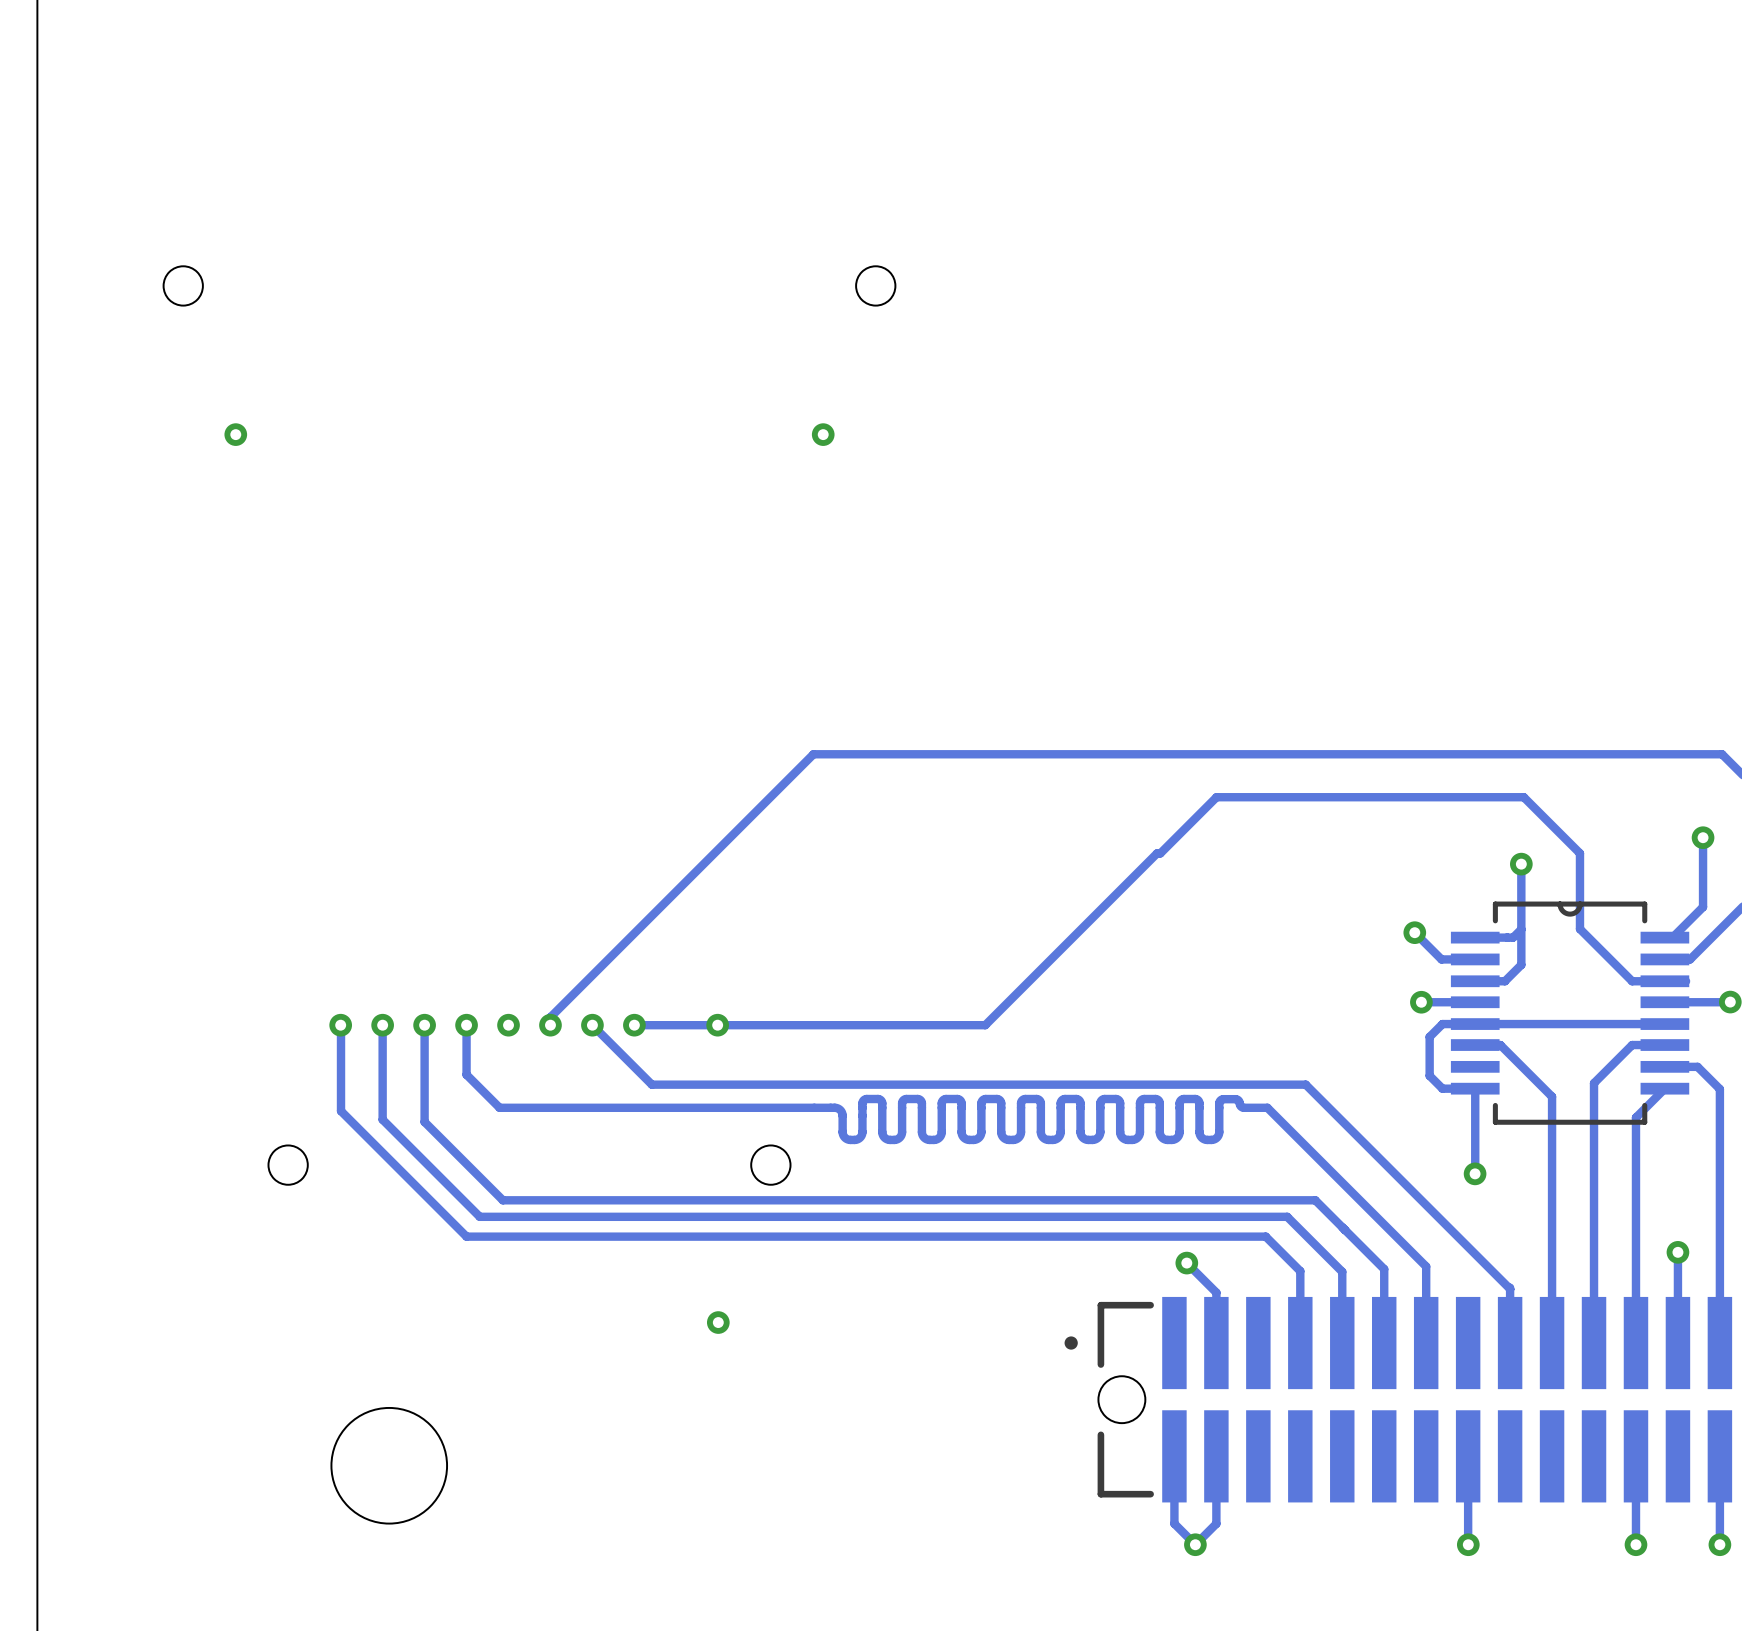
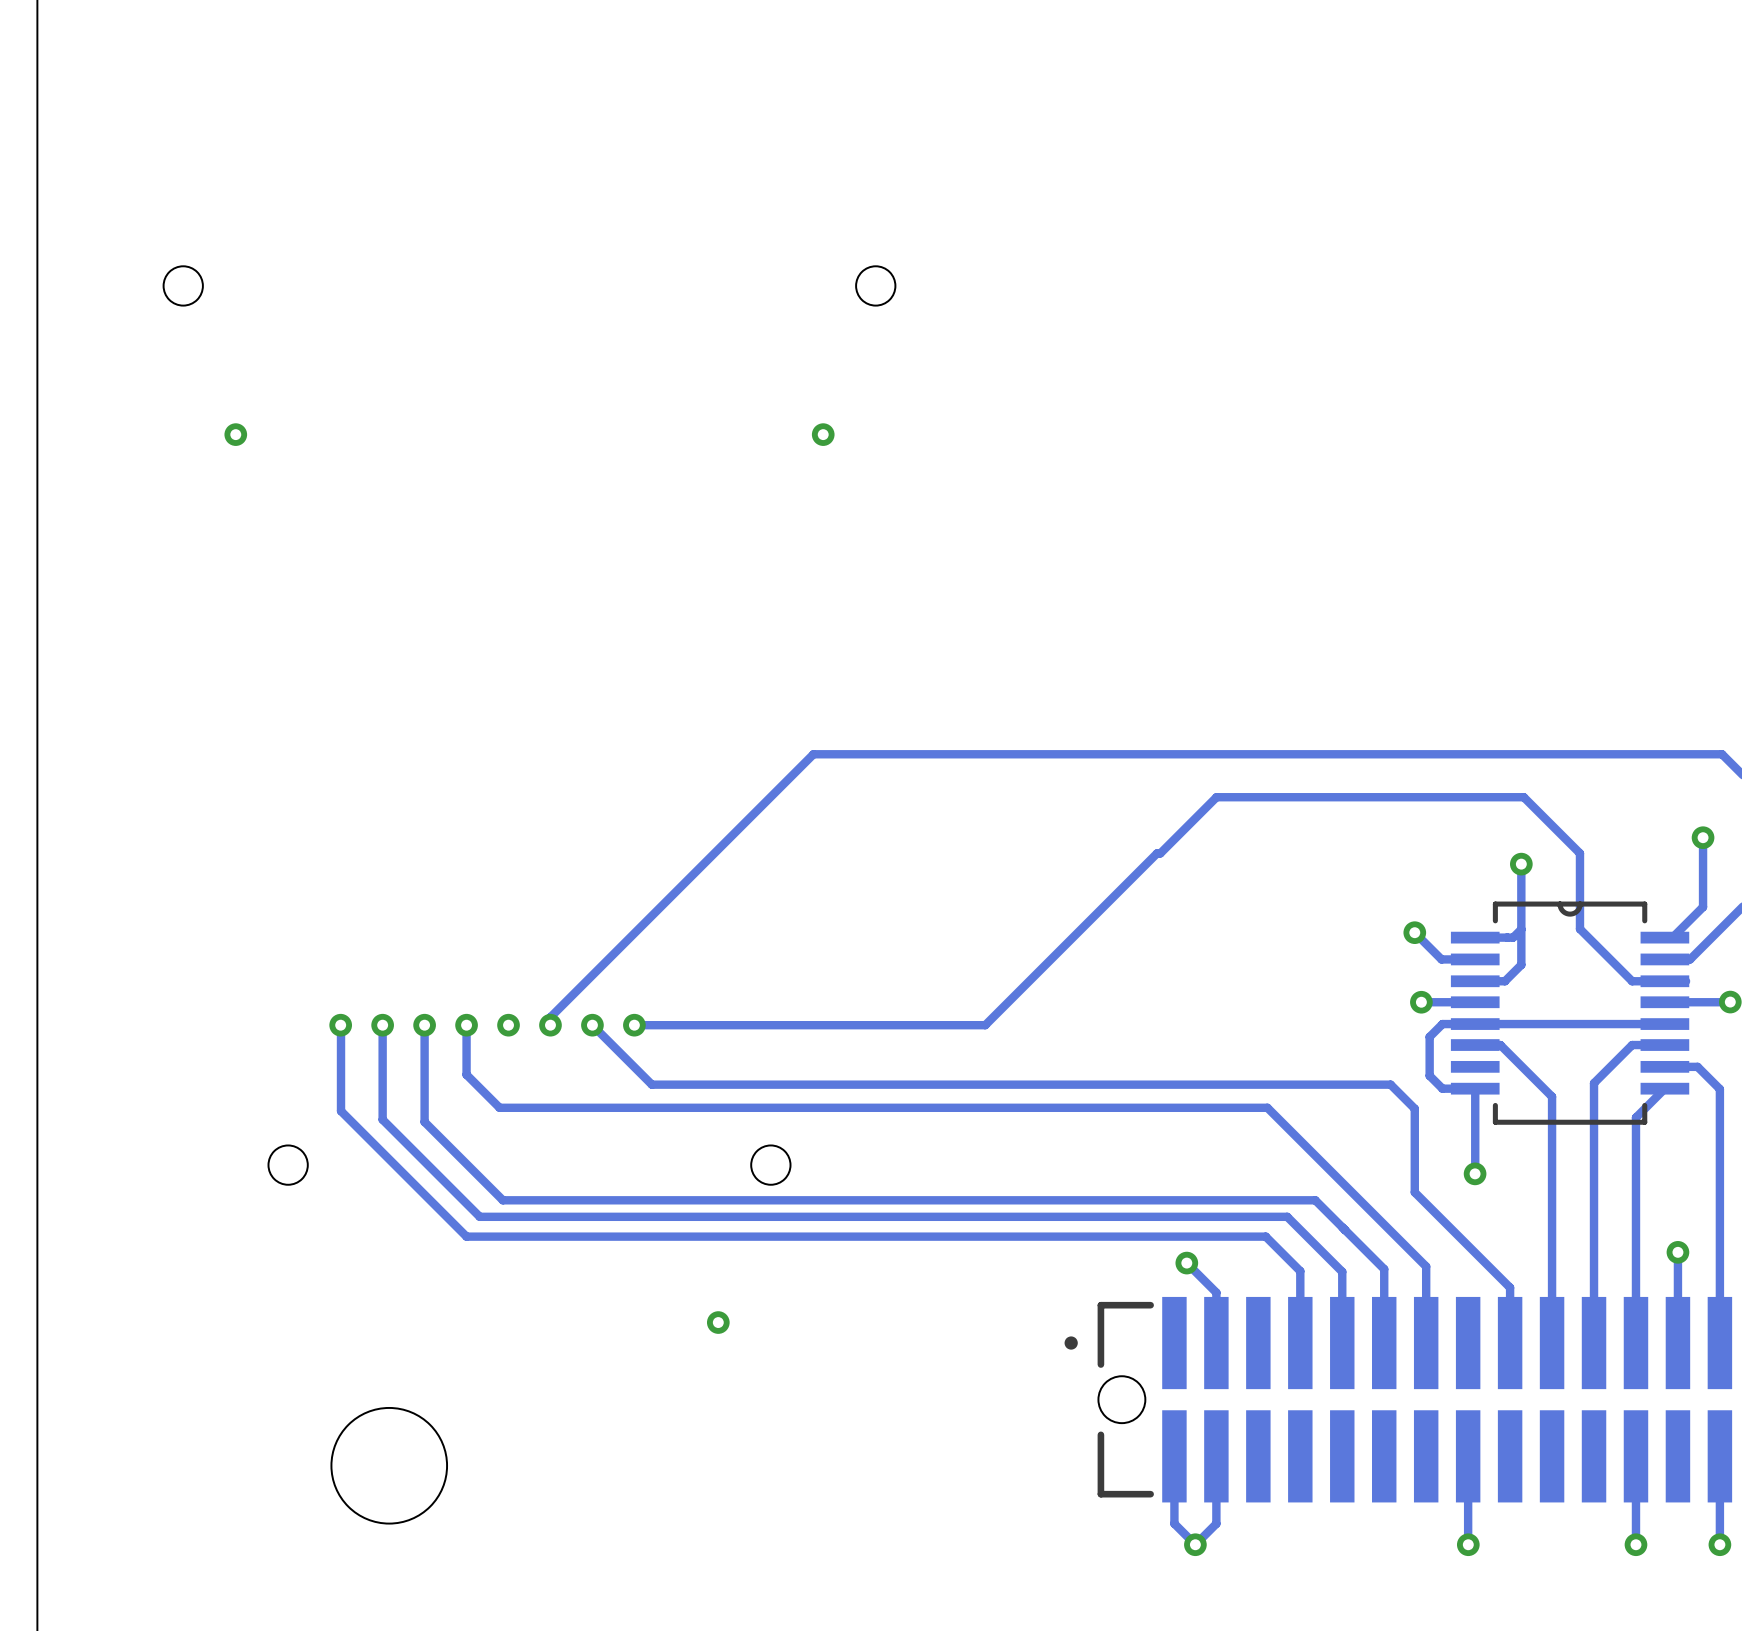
via: (717, 1025) -> none
track: (1305, 1084) (1510, 1289) -> (1305, 1084) (1390, 1084) (1414, 1108) (1414, 1192) (1510, 1287)
track: (1244, 1107) (1236, 1099) (1220, 1100) (1219, 1133) (1216, 1138) (1211, 1139) (1203, 1139) (1199, 1134) (1199, 1102) (1195, 1099) (1183, 1099) (1180, 1101) (1179, 1133) (1176, 1138) (1171, 1139) (1164, 1139) (1160, 1134) (1159, 1102) (1155, 1099) (1143, 1099) (1140, 1101) (1139, 1133) (1136, 1138) (1132, 1139) (1124, 1139) (1120, 1134) (1120, 1102) (1116, 1099) (1104, 1099) (1101, 1101) (1100, 1133) (1097, 1138) (1092, 1139) (1085, 1139) (1080, 1134) (1080, 1102) (1076, 1099) (1064, 1099) (1061, 1101) (1060, 1133) (1057, 1138) (1052, 1139) (1045, 1139) (1041, 1134) (1040, 1102) (1036, 1099) (1024, 1099) (1021, 1101) (1020, 1133) (1018, 1138) (1013, 1139) (1005, 1139) (1001, 1134) (1001, 1102) (997, 1099) (985, 1099) (982, 1101) (981, 1133) (978, 1138) (973, 1139) (966, 1139) (962, 1134) (961, 1102) (958, 1099) (945, 1099) (942, 1101) (941, 1133) (934, 1139) (926, 1139) (922, 1134) (921, 1102) (918, 1099) (906, 1099) (902, 1101) (901, 1133) (895, 1139) (886, 1139) (882, 1134) (882, 1102) (879, 1099) (866, 1099) (863, 1101) (862, 1133) (856, 1139) (848, 1139) (843, 1136) (842, 1113) (834, 1107) -> (1244, 1107) (834, 1107)

